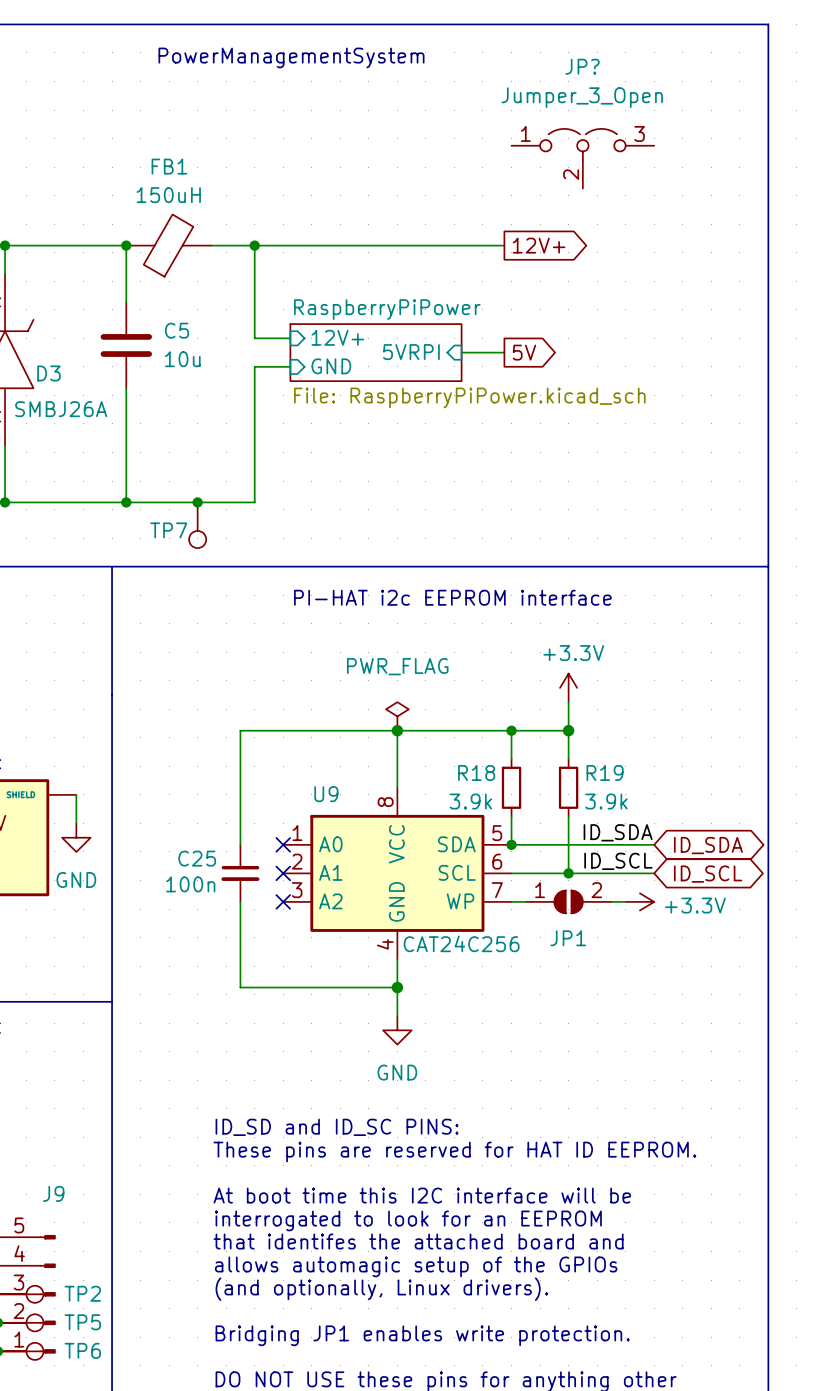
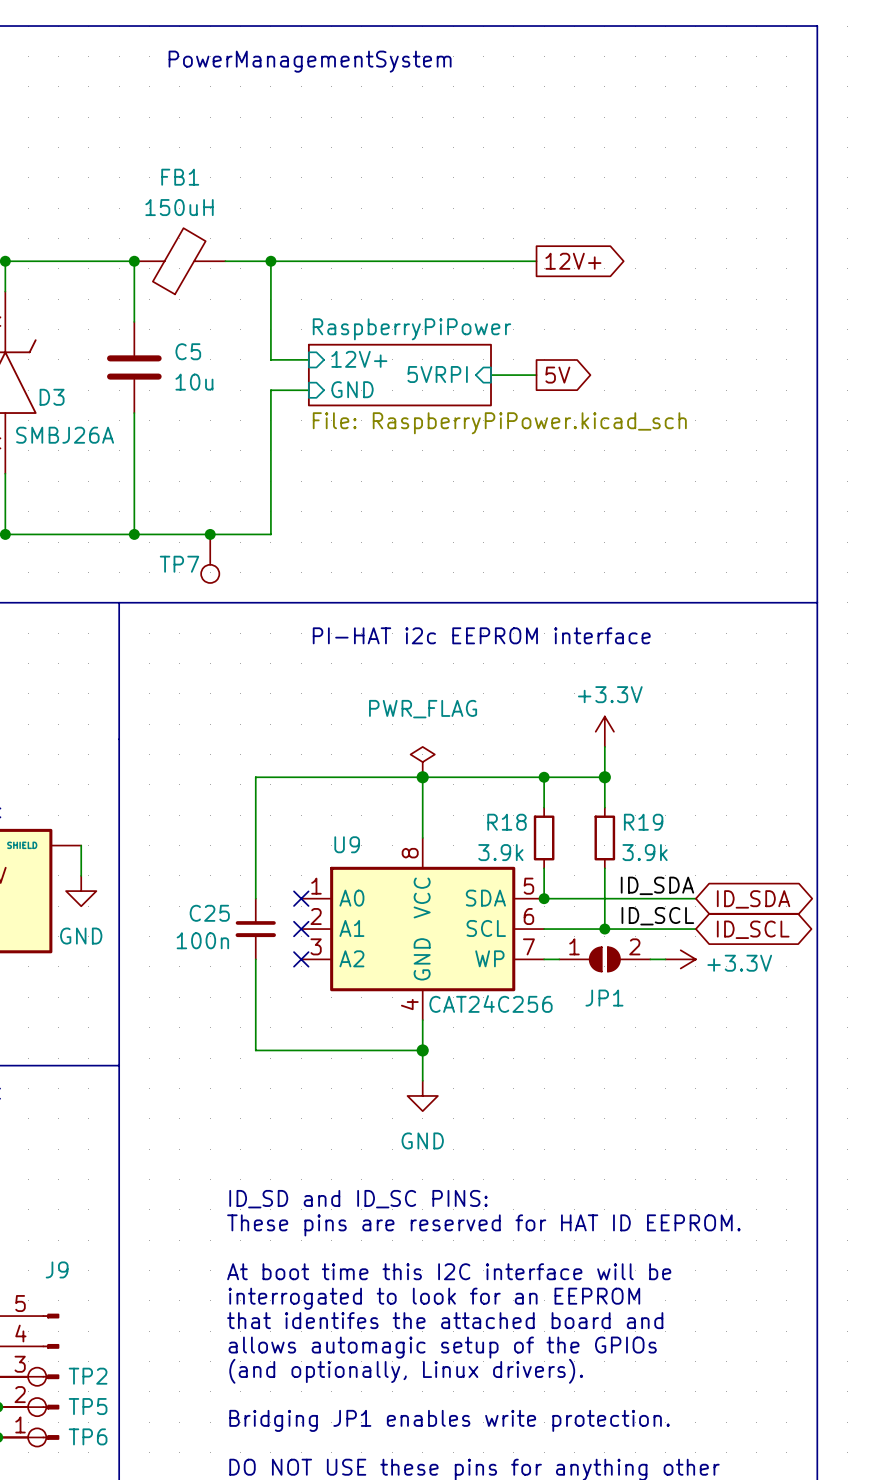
JP?: Jumper_3_Open (582, 158) -> none

